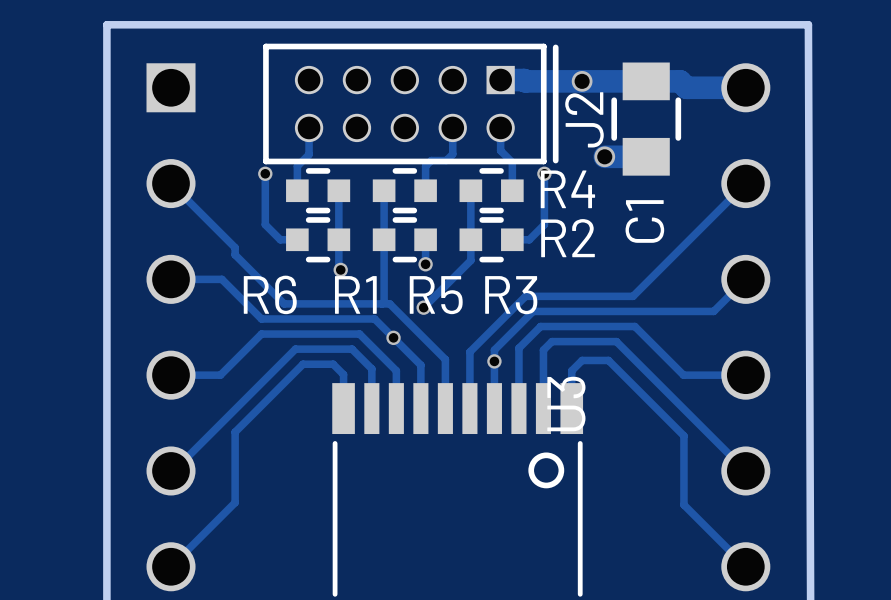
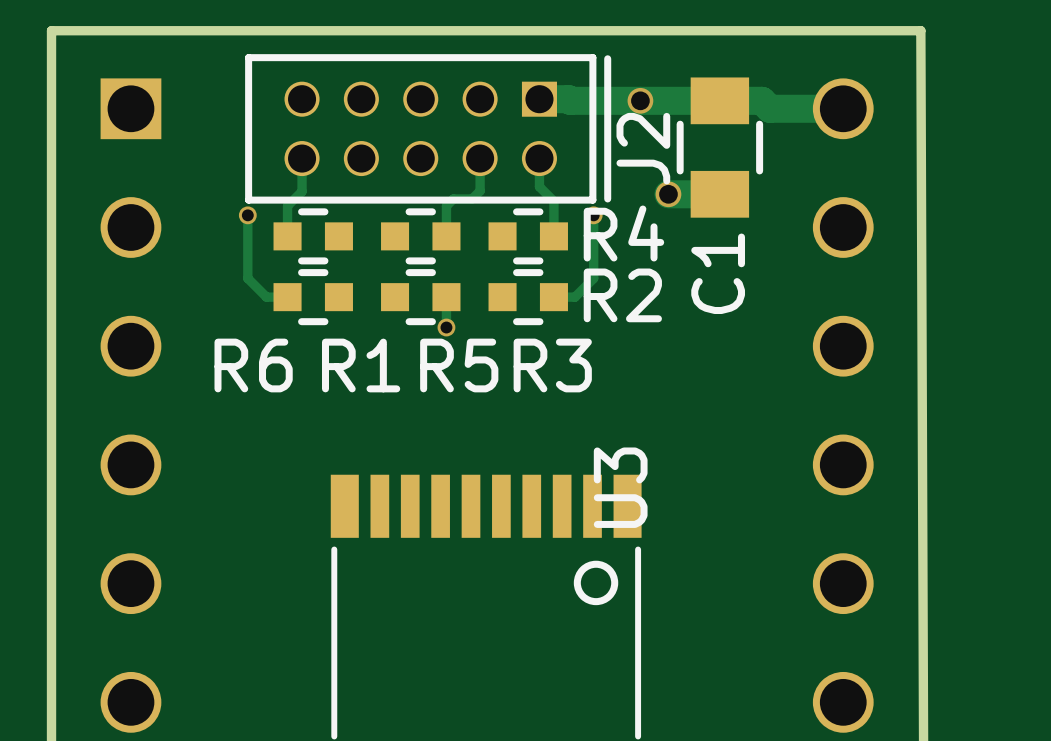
track: (171, 183) (235, 247) (235, 254) (284, 303) (389, 303) (445, 359) (445, 408) -> none
track: (745, 183) (633, 296) (525, 296) (469, 351) (469, 408) -> none
track: (338, 190) (338, 268) (340, 269) -> none
track: (384, 190) (384, 302) (382, 303) -> none
track: (470, 190) (470, 260) (423, 307) -> none
via: (340, 269) -> none
track: (171, 279) (221, 279) (261, 318) (374, 318) (420, 365) (420, 408) -> none
track: (745, 279) (713, 311) (533, 311) (494, 350) (494, 408) -> none
via: (423, 307) -> none
via: (393, 337) -> none
via: (494, 361) -> none
track: (171, 375) (220, 375) (261, 334) (359, 334) (396, 370) (396, 408) -> none
track: (745, 375) (683, 375) (634, 326) (540, 326) (518, 348) (518, 408) -> none
track: (343, 408) (343, 374) (333, 364) (303, 364) (235, 432) (235, 502) (171, 566) -> none
track: (371, 408) (371, 368) (352, 349) (295, 349) (173, 470) (171, 470) -> none
track: (543, 408) (543, 350) (551, 341) (616, 341) (745, 470) -> none
track: (571, 408) (571, 370) (582, 360) (608, 360) (683, 435) (683, 504) (745, 566) -> none

